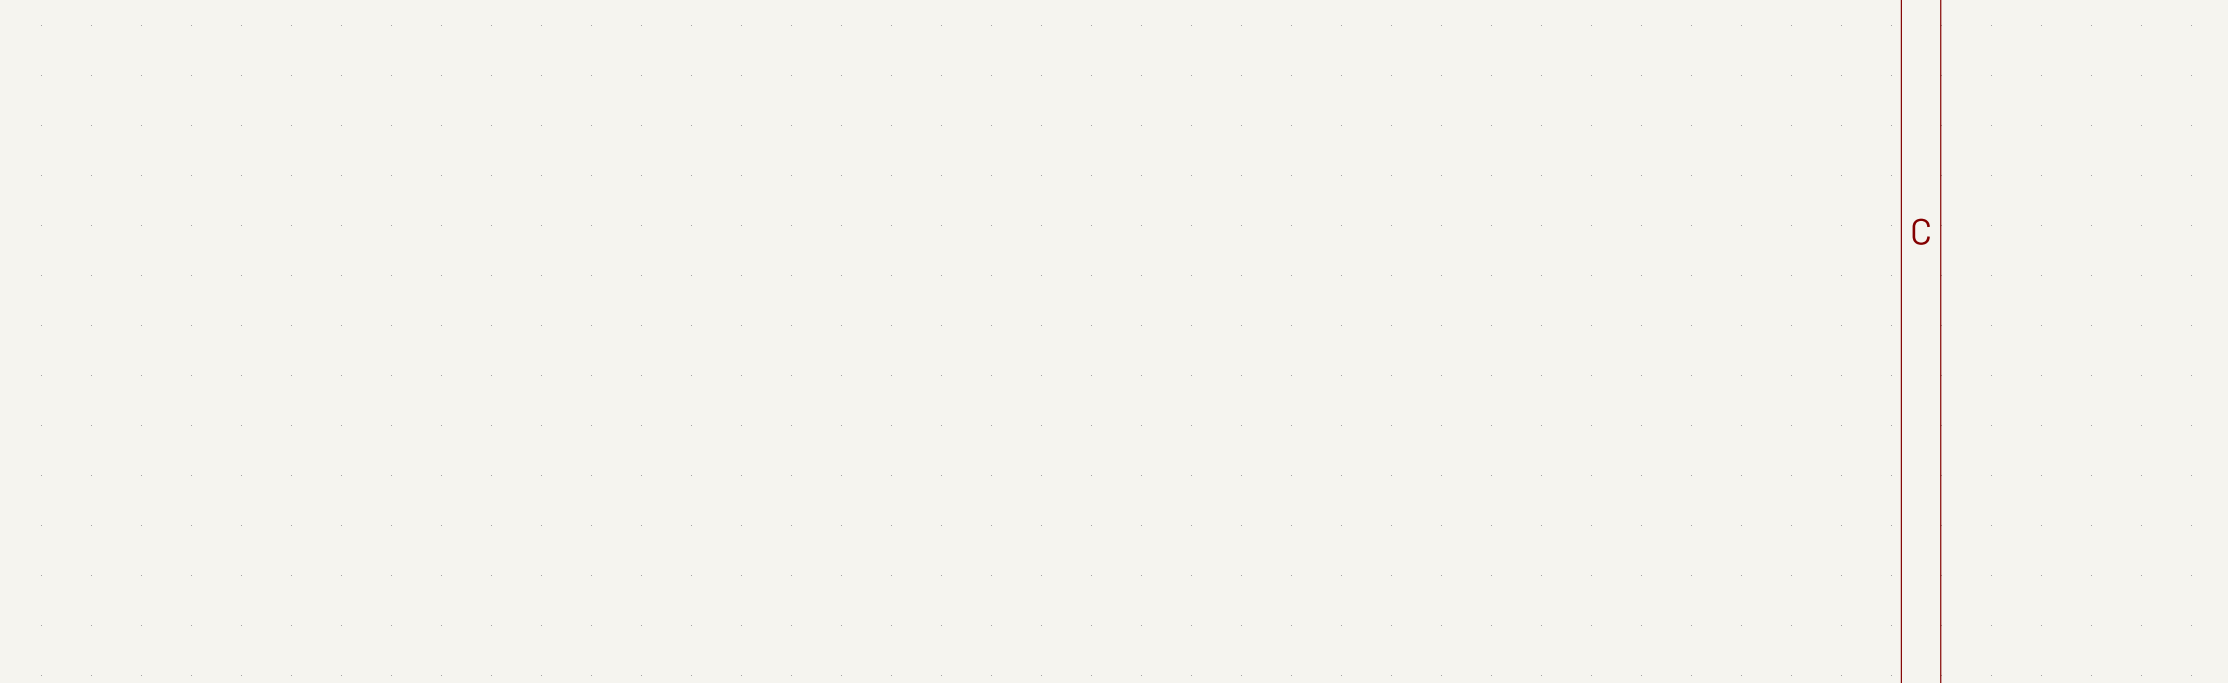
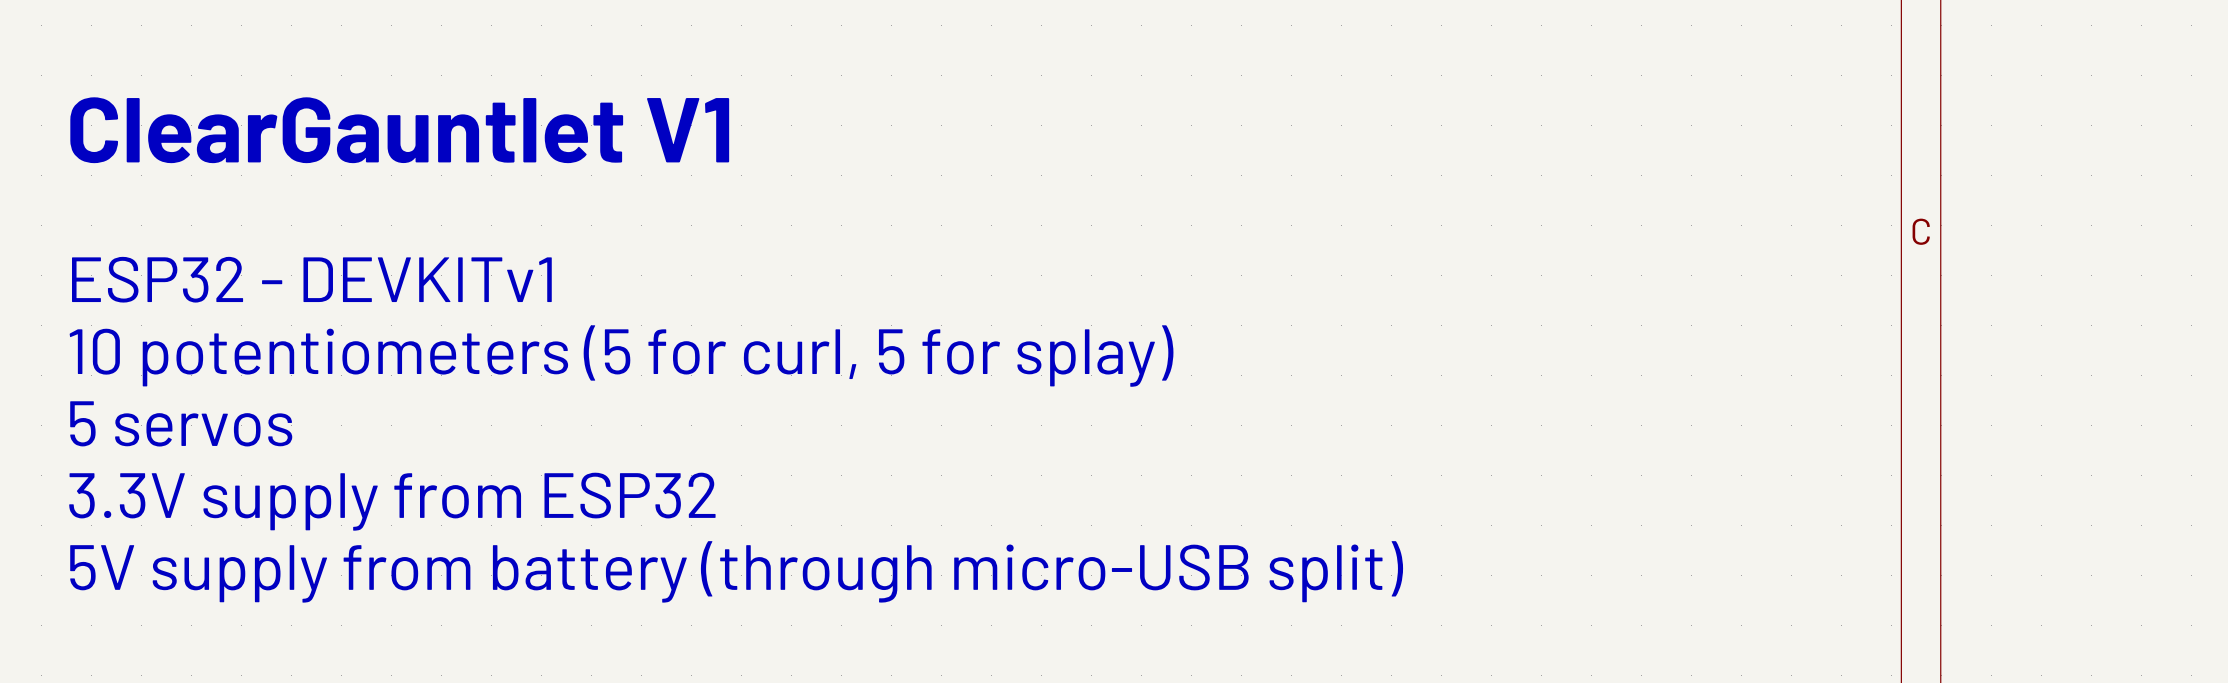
text: none -> ClearGauntlet V1 (399, 130)
text: none -> ESP32 - DEVKITv1 (311, 279)
text: none -> 10 potentiometers (5 for curl, 5 for splay) (621, 356)
text: none -> 5 servos (181, 423)
text: none -> 3.3V supply from ESP32 (392, 501)
text: none -> 5V supply from battery (through micro-USB split) (736, 571)

